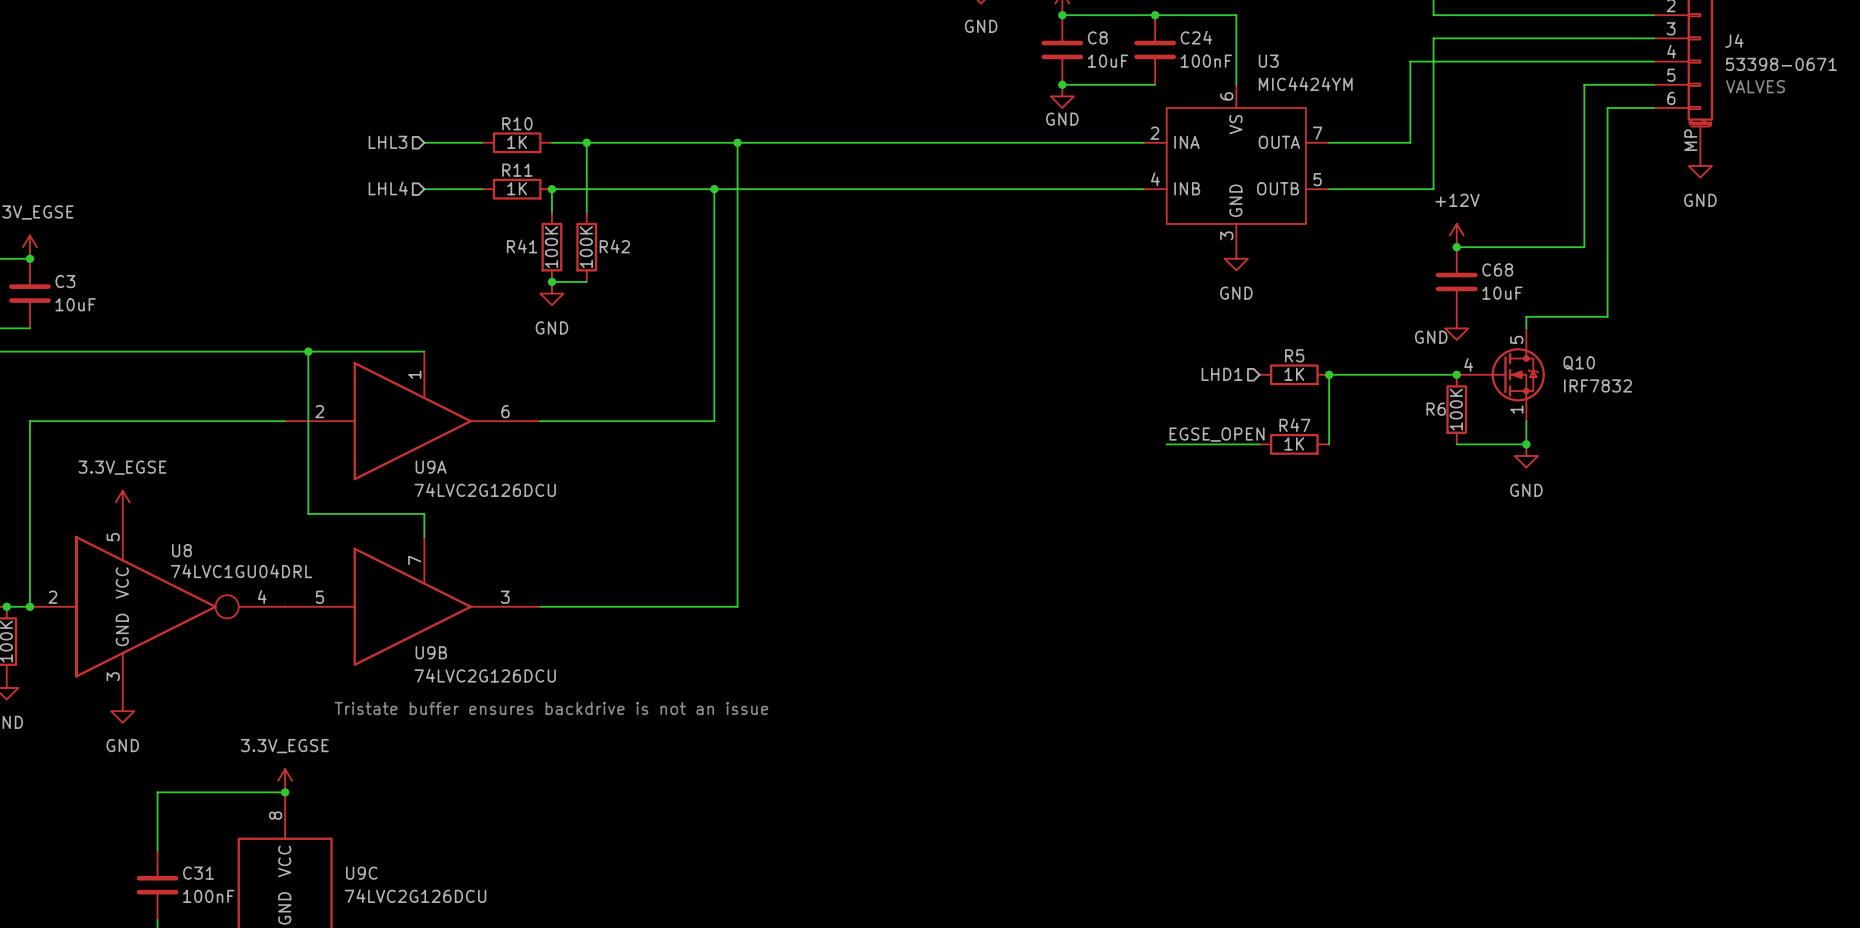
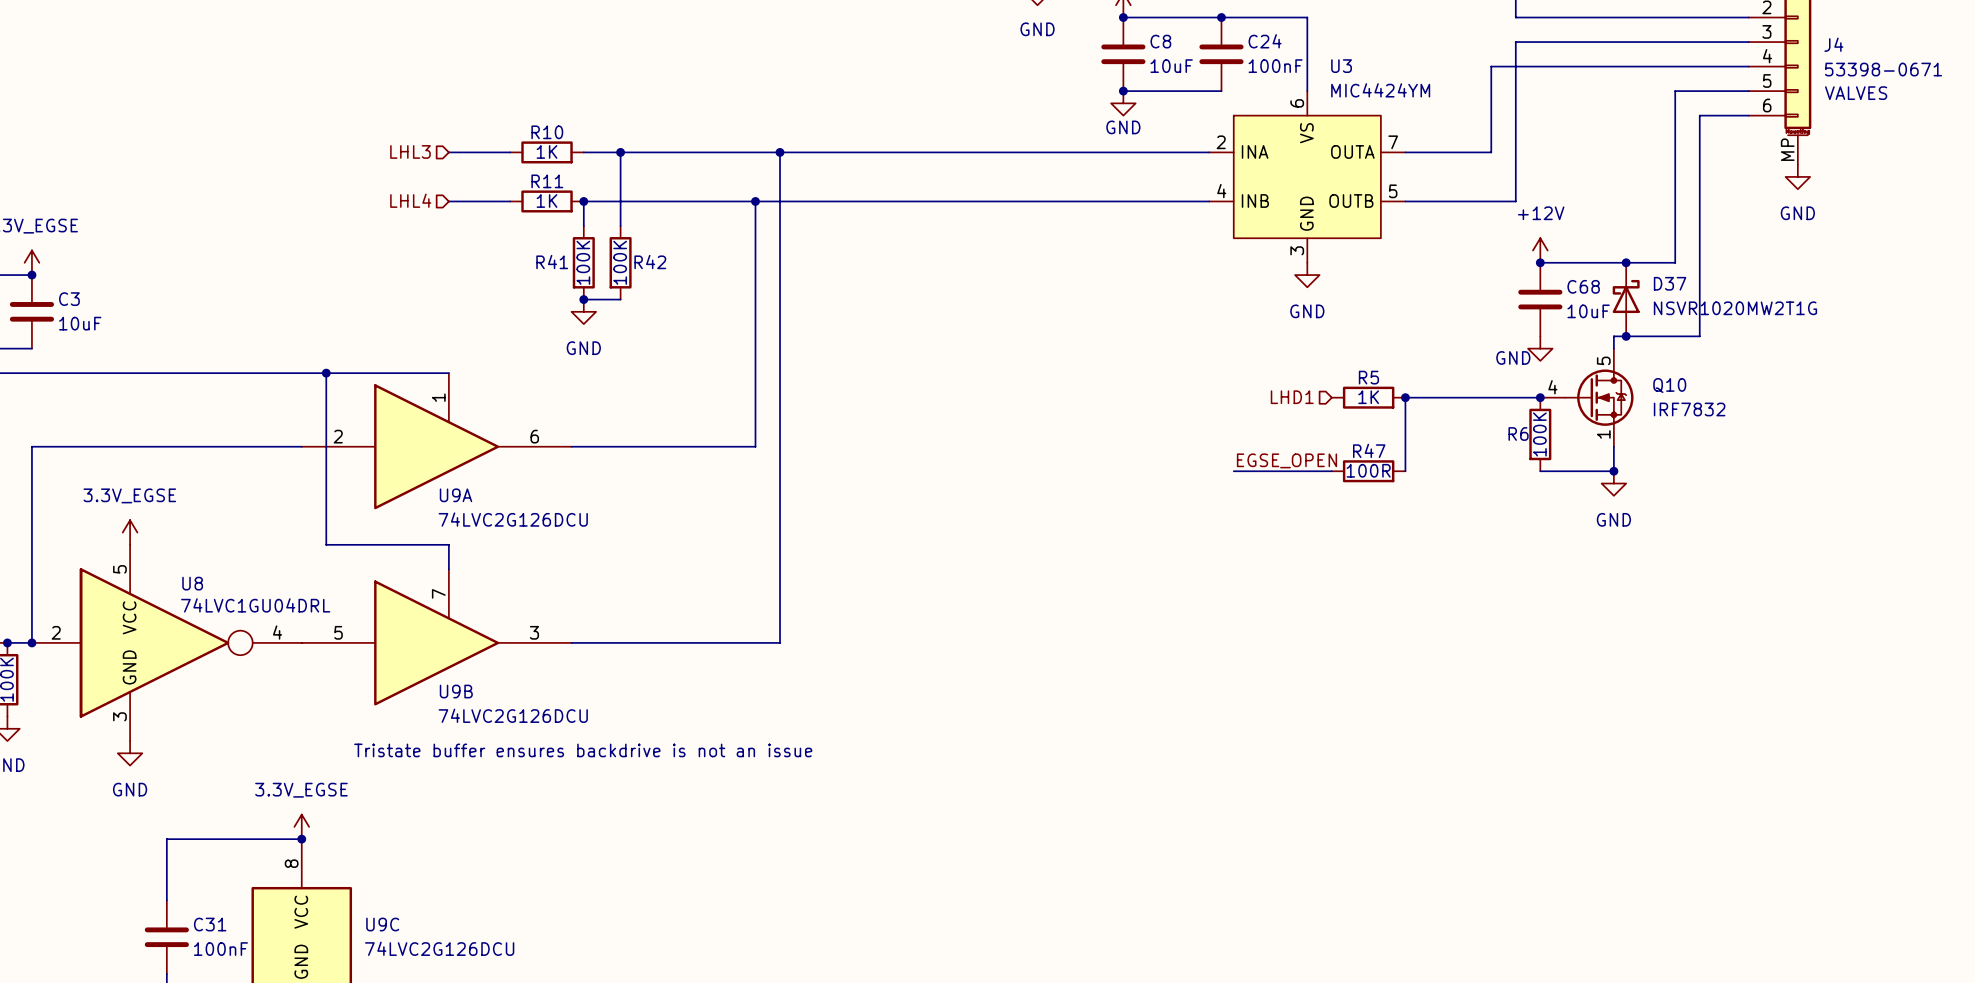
junction: none -> (1626, 262)
D37: none -> NSVR1020MW2T1G (1626, 299)
junction: none -> (1626, 336)
R47 value: 1K (1294, 443) -> 100R (1368, 470)

